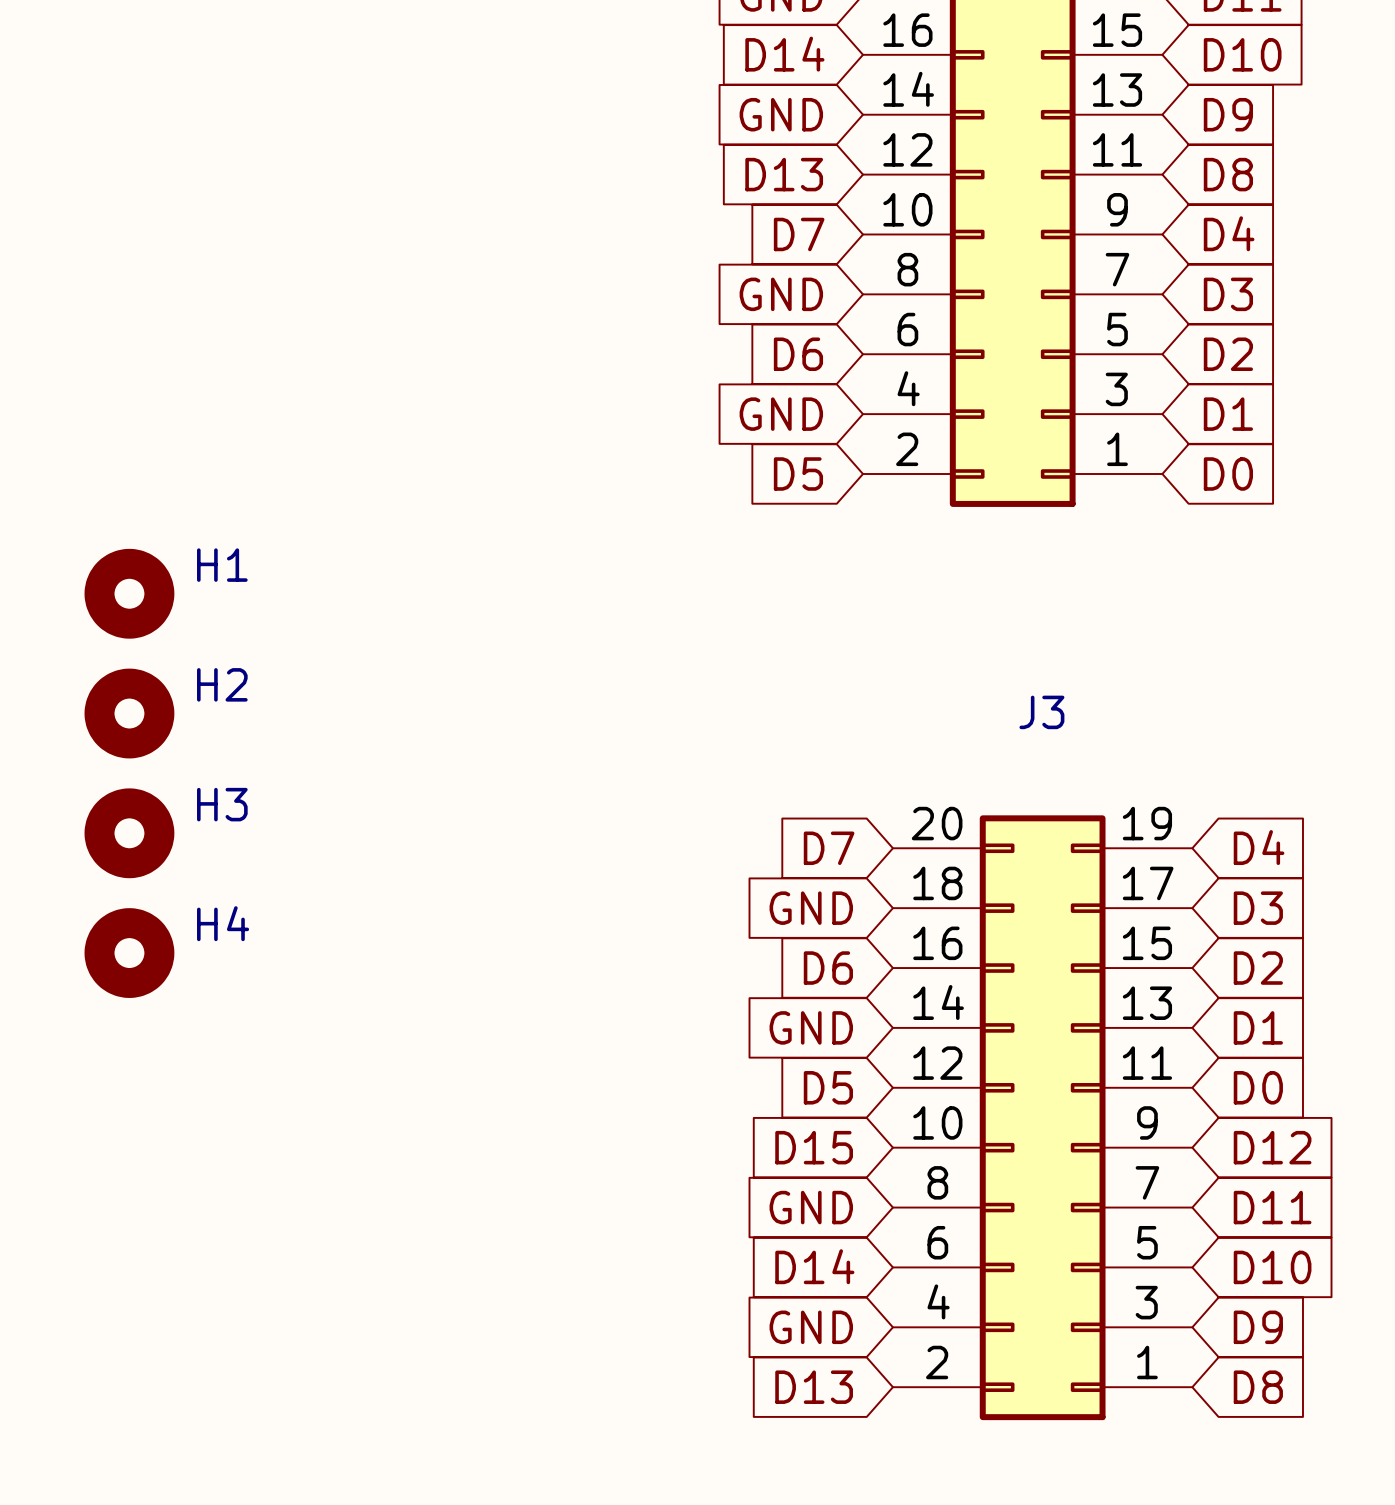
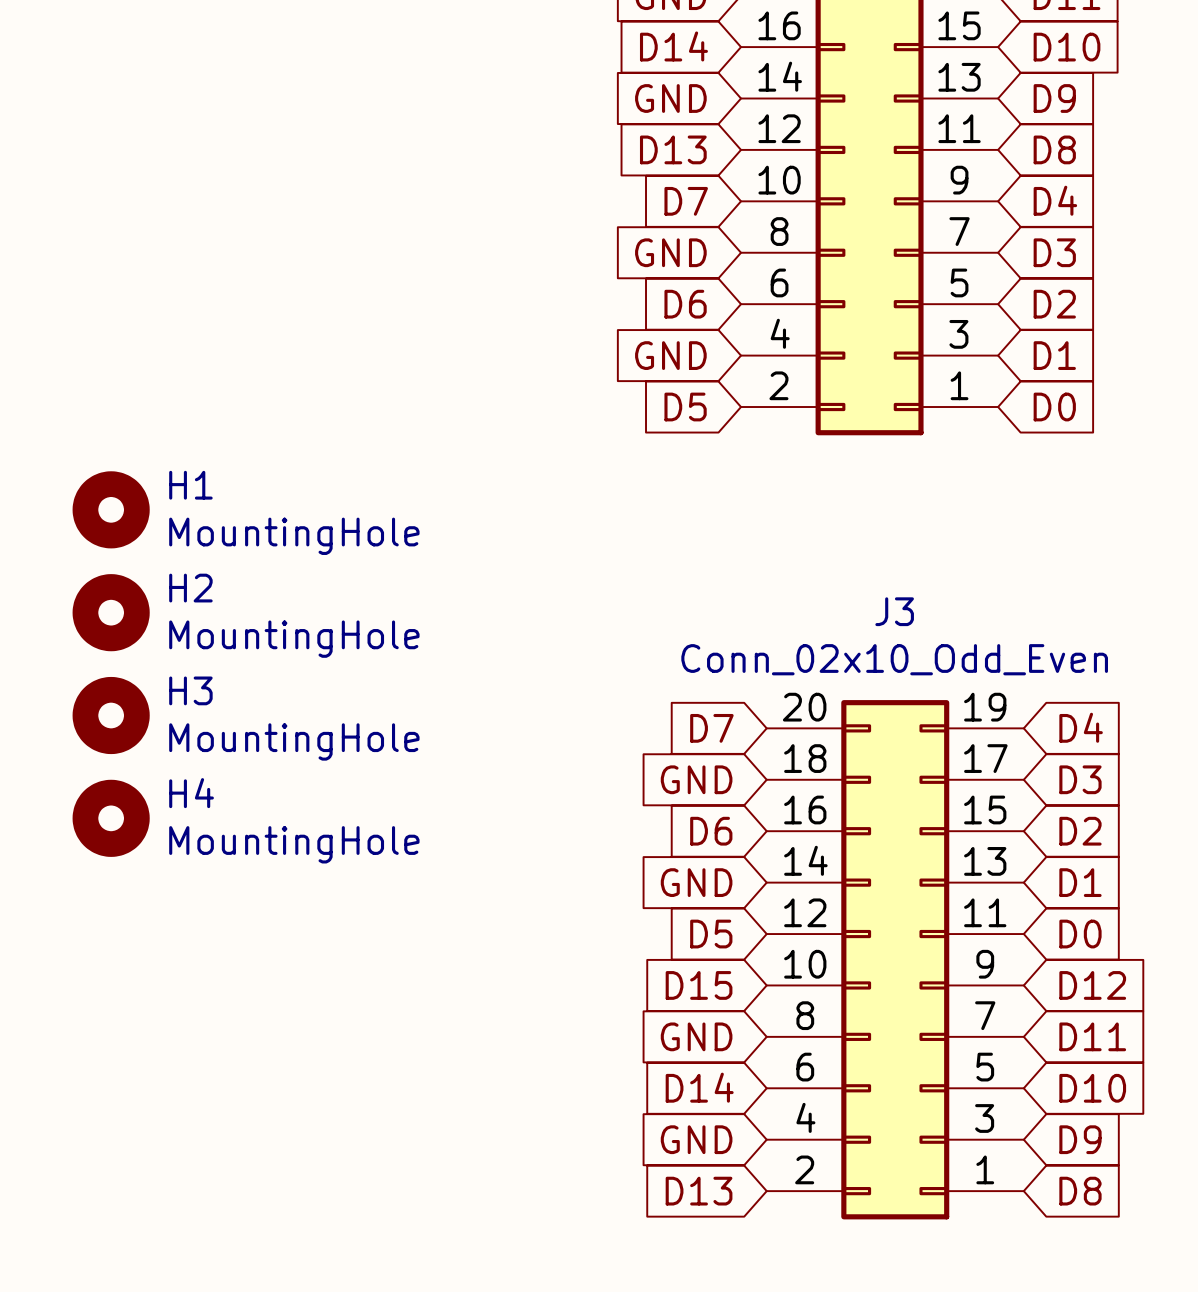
H1 value: none -> MountingHole (294, 536)
H2 value: none -> MountingHole (294, 639)
J3 value: none -> Conn_02x10_Odd_Even (894, 659)
H3 value: none -> MountingHole (294, 741)
H4 value: none -> MountingHole (294, 844)

